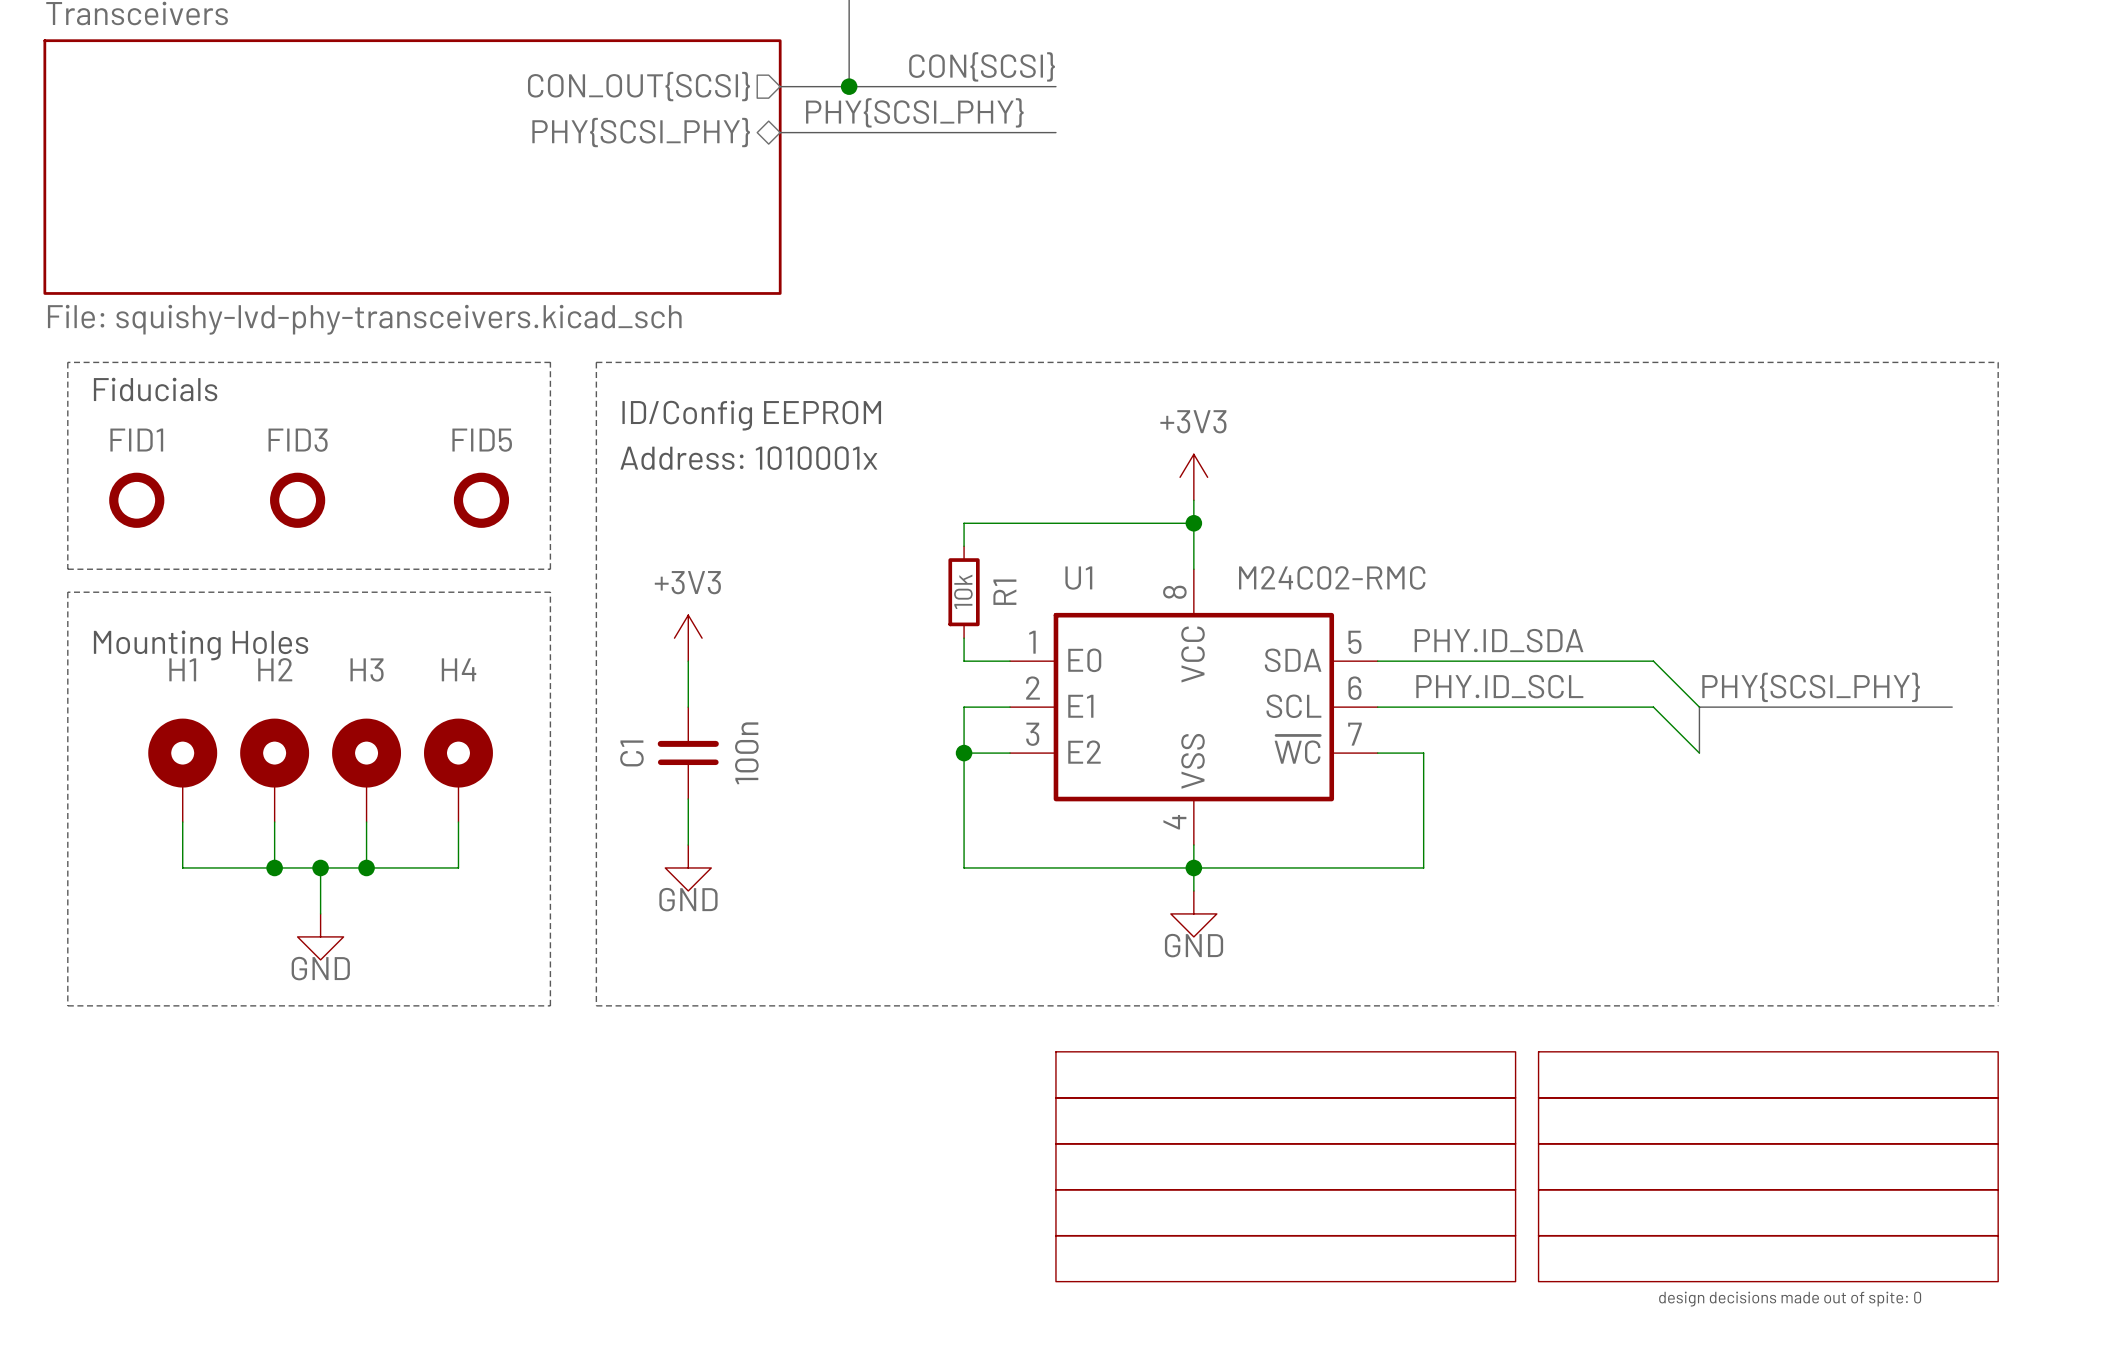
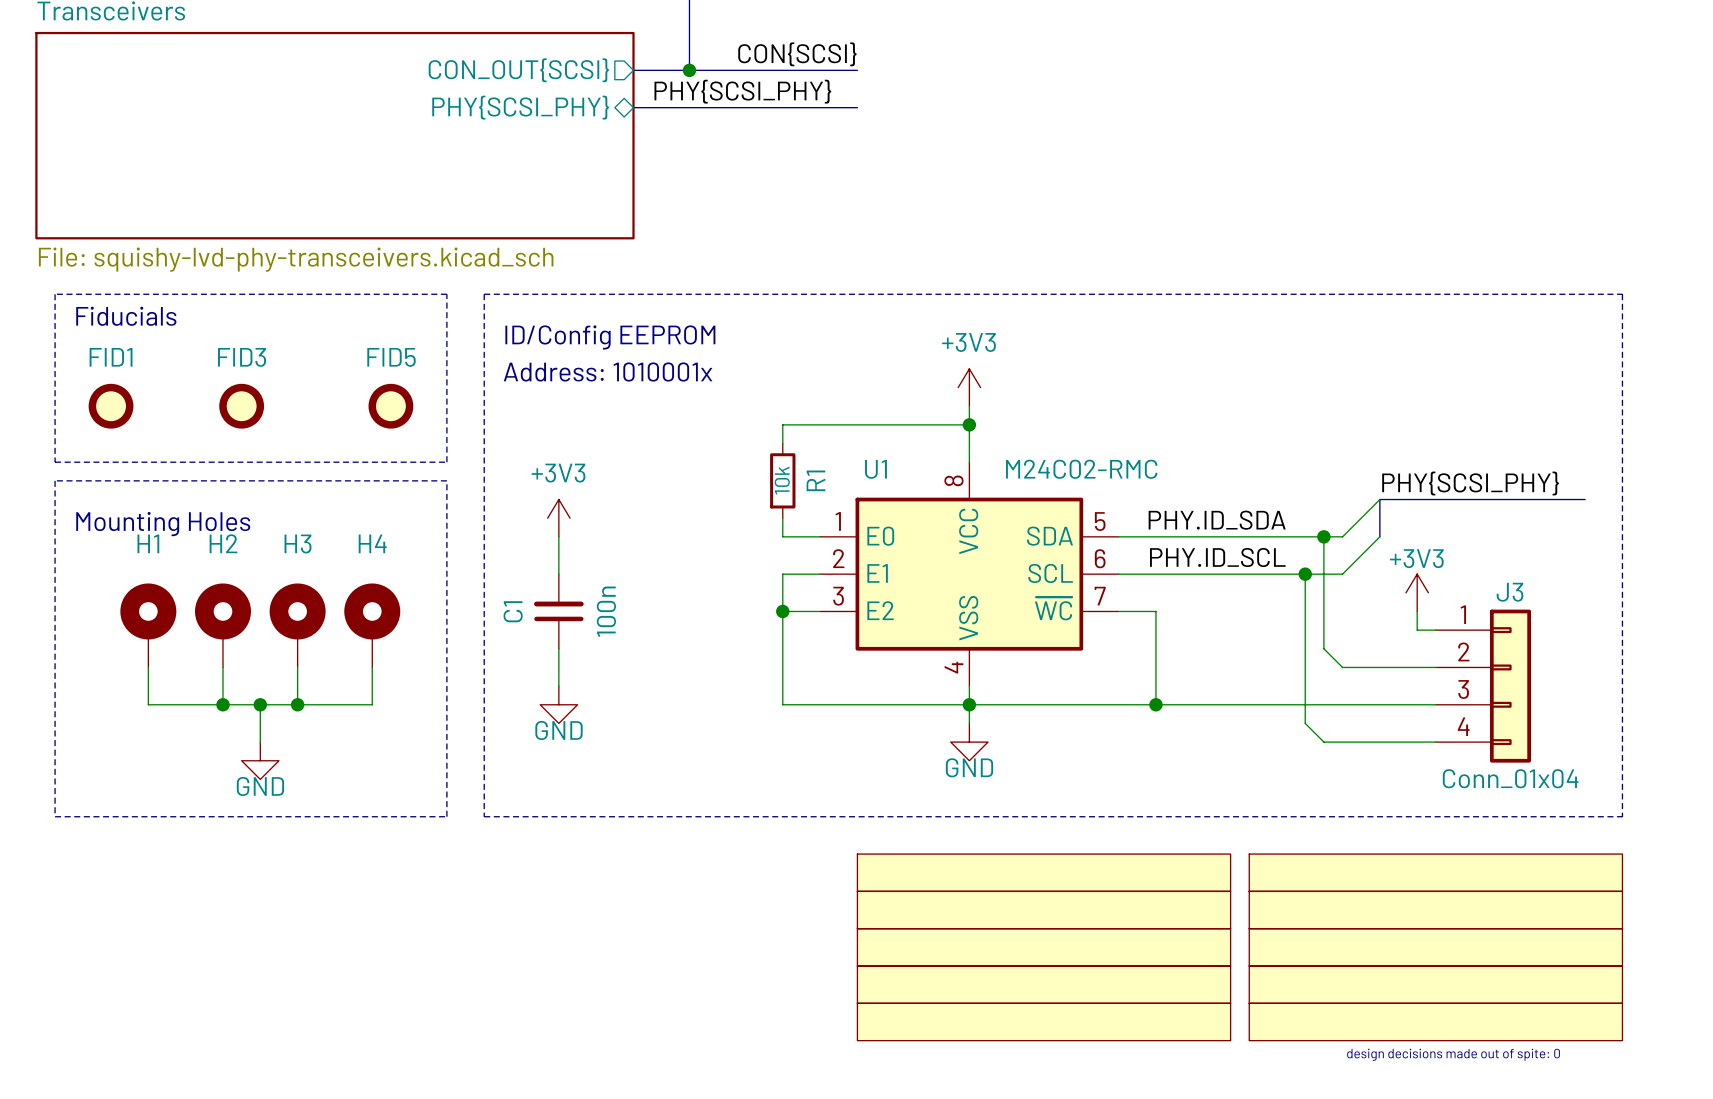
wire: none -> (1323, 536) (1323, 648) (1342, 667) (1435, 667)
junction: none -> (1323, 536)
wire: (1653, 661) (1699, 707) -> (1342, 536) (1379, 499)
label position: PHY{SCSI_PHY} (1811, 687) -> PHY{SCSI_PHY} (1470, 483)
wire: none -> (1305, 574) (1305, 723) (1323, 742) (1435, 742)
junction: none -> (1305, 574)
wire: (1653, 707) (1699, 753) -> (1342, 574) (1379, 536)
bus: (1952, 707) (1699, 707) (1699, 753) -> (1585, 499) (1379, 499) (1379, 536)
power symbol: none -> +3V3 (1417, 592)
wire: none -> (1417, 611) (1417, 630) (1435, 630)
J3: none -> Conn_01x04 (1483, 686)
wire: none -> (1155, 704) (1435, 704)
junction: none -> (1155, 704)

